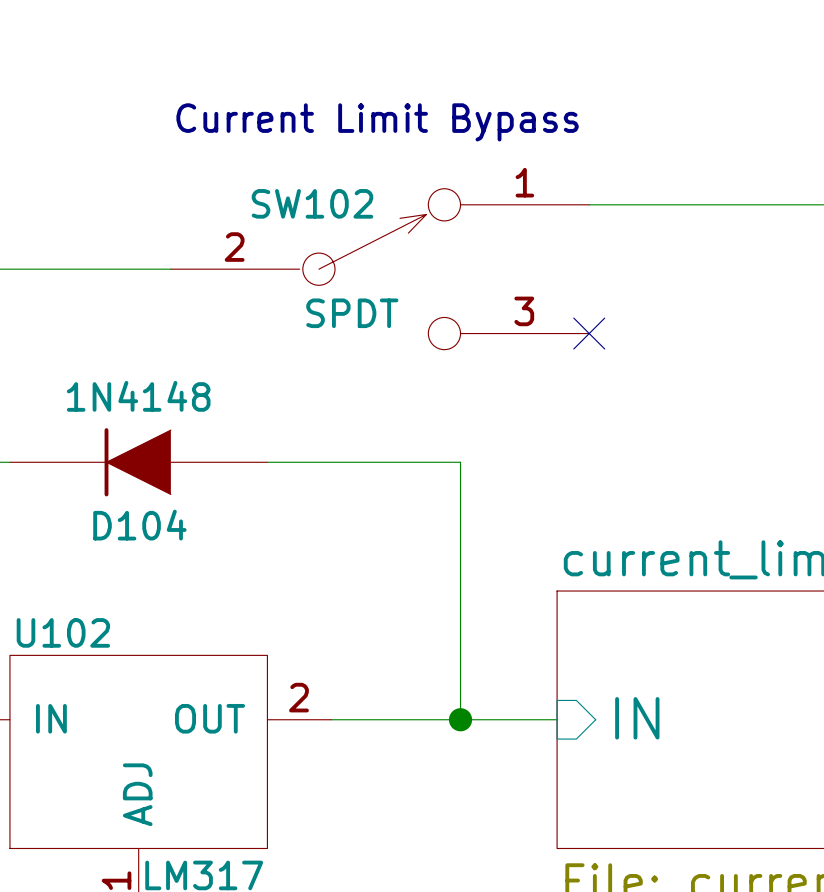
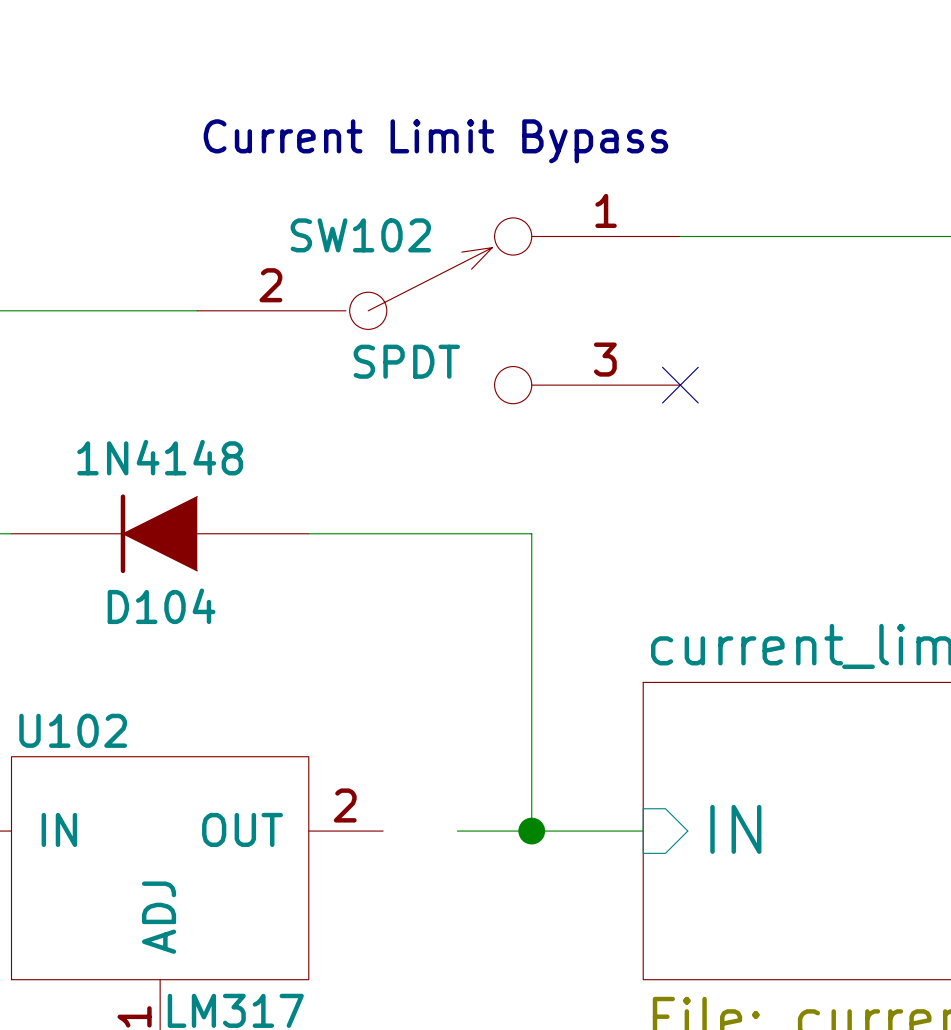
wire: (331, 719) (396, 719) -> none

